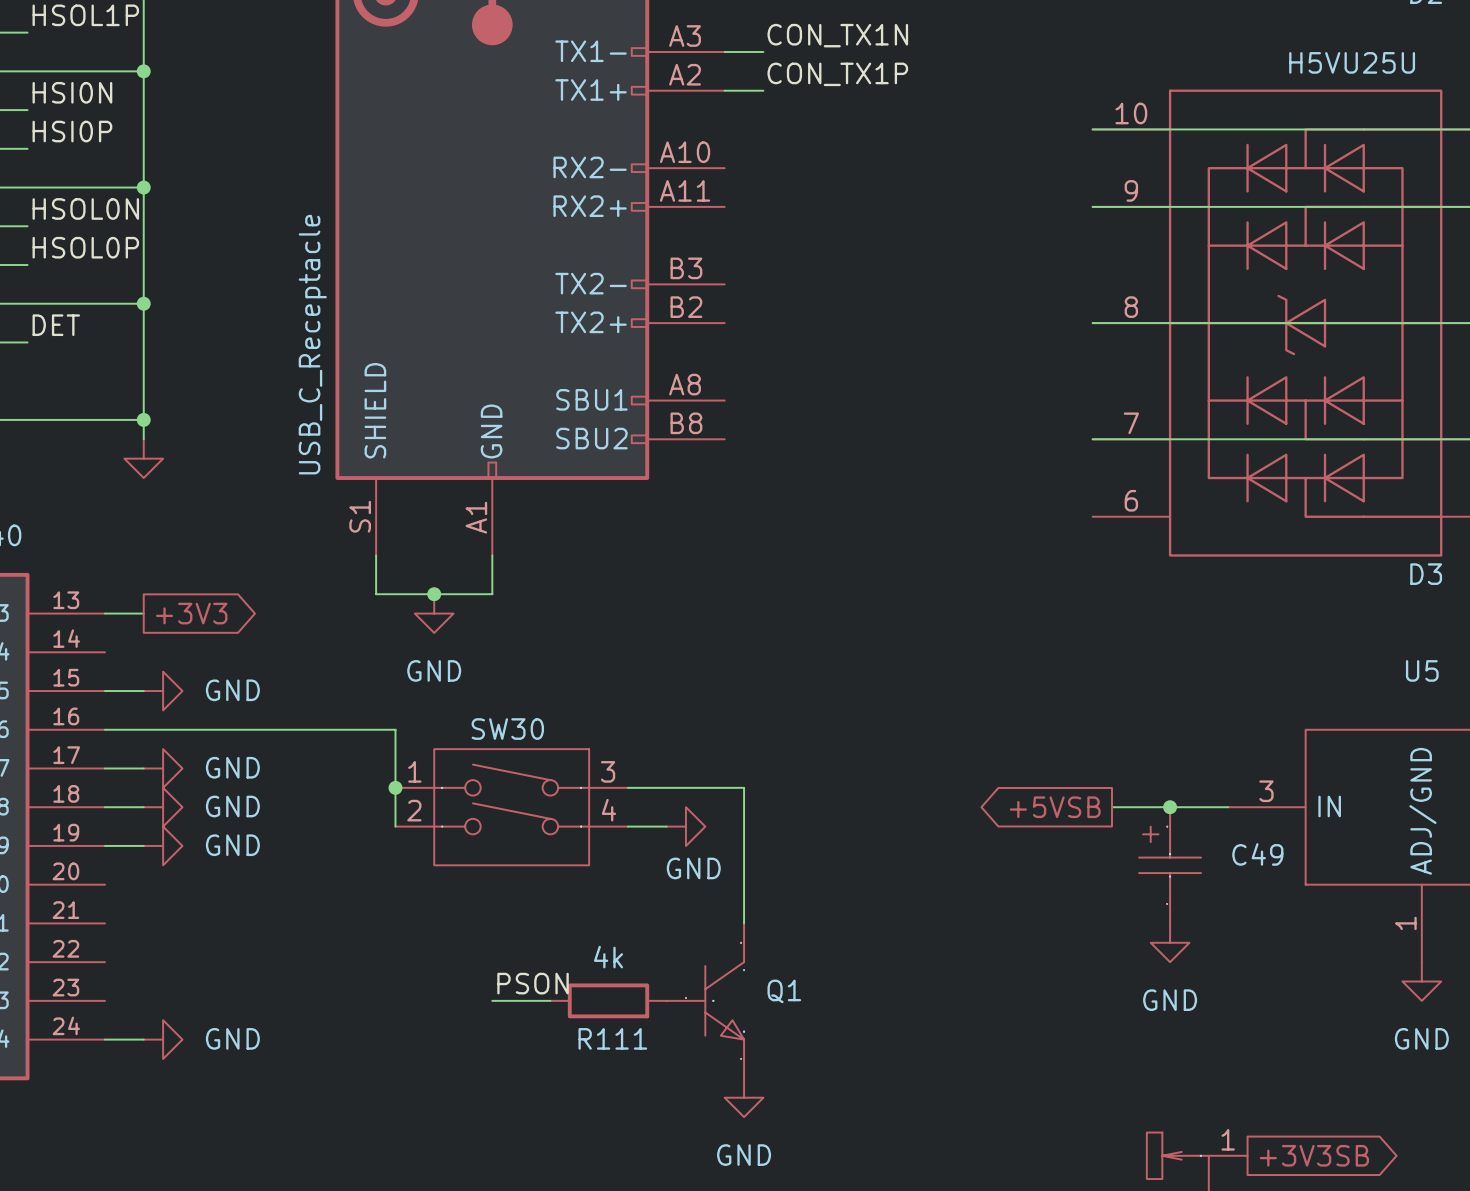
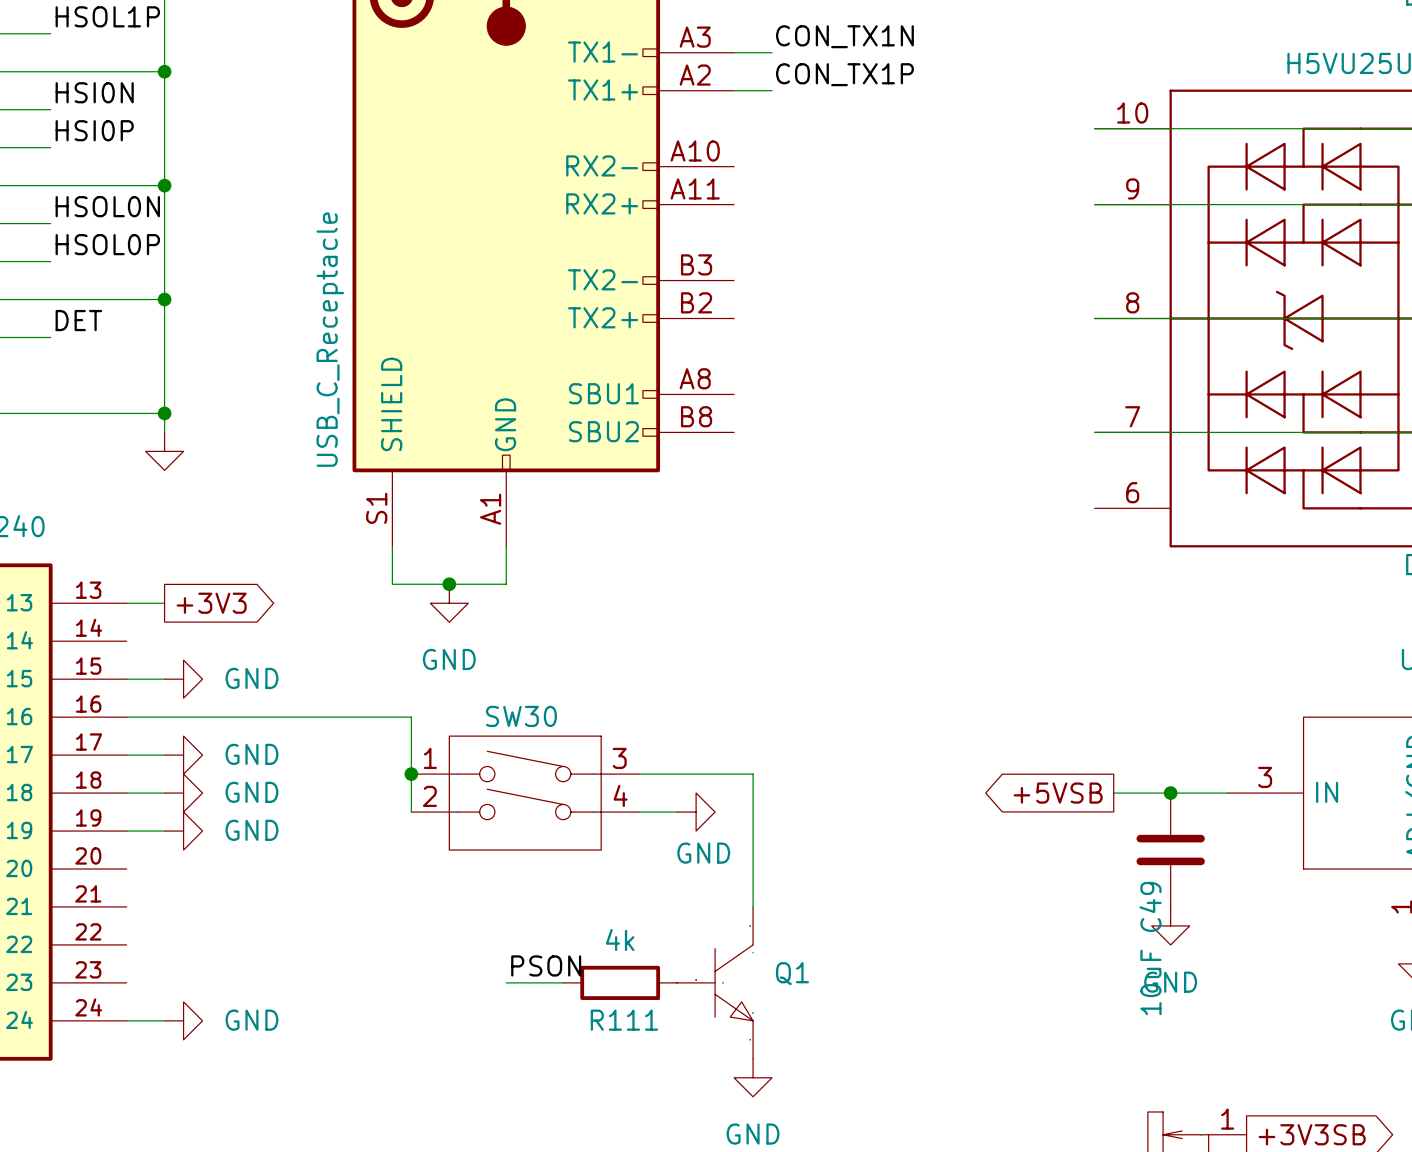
C49 symbol: [1139, 807, 1202, 924] -> [1136, 793, 1205, 907]
C49 name position: C49 (1257, 854) -> C49 (1150, 906)
C49 value: none -> 10uF (1150, 982)

